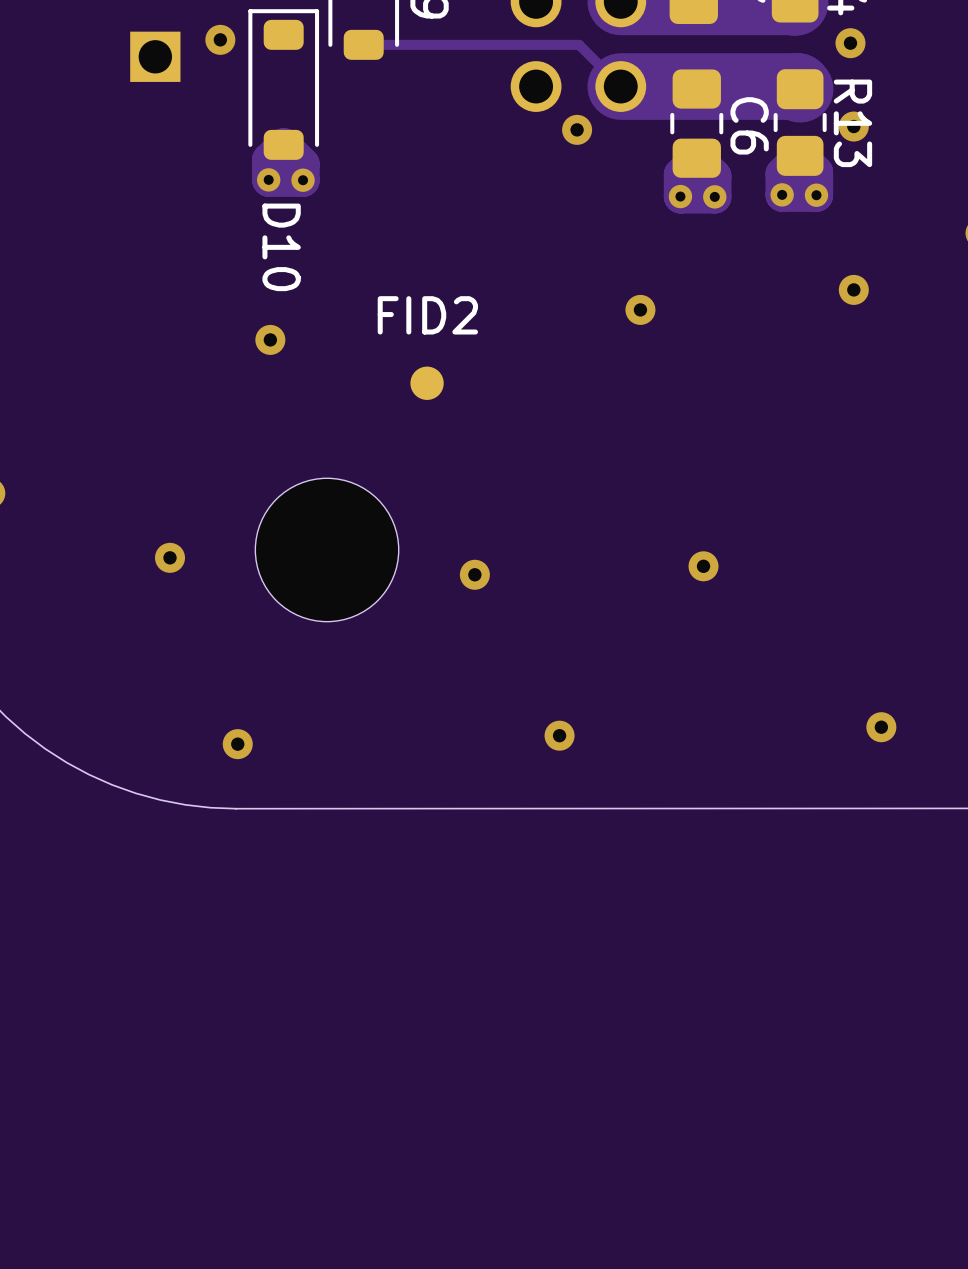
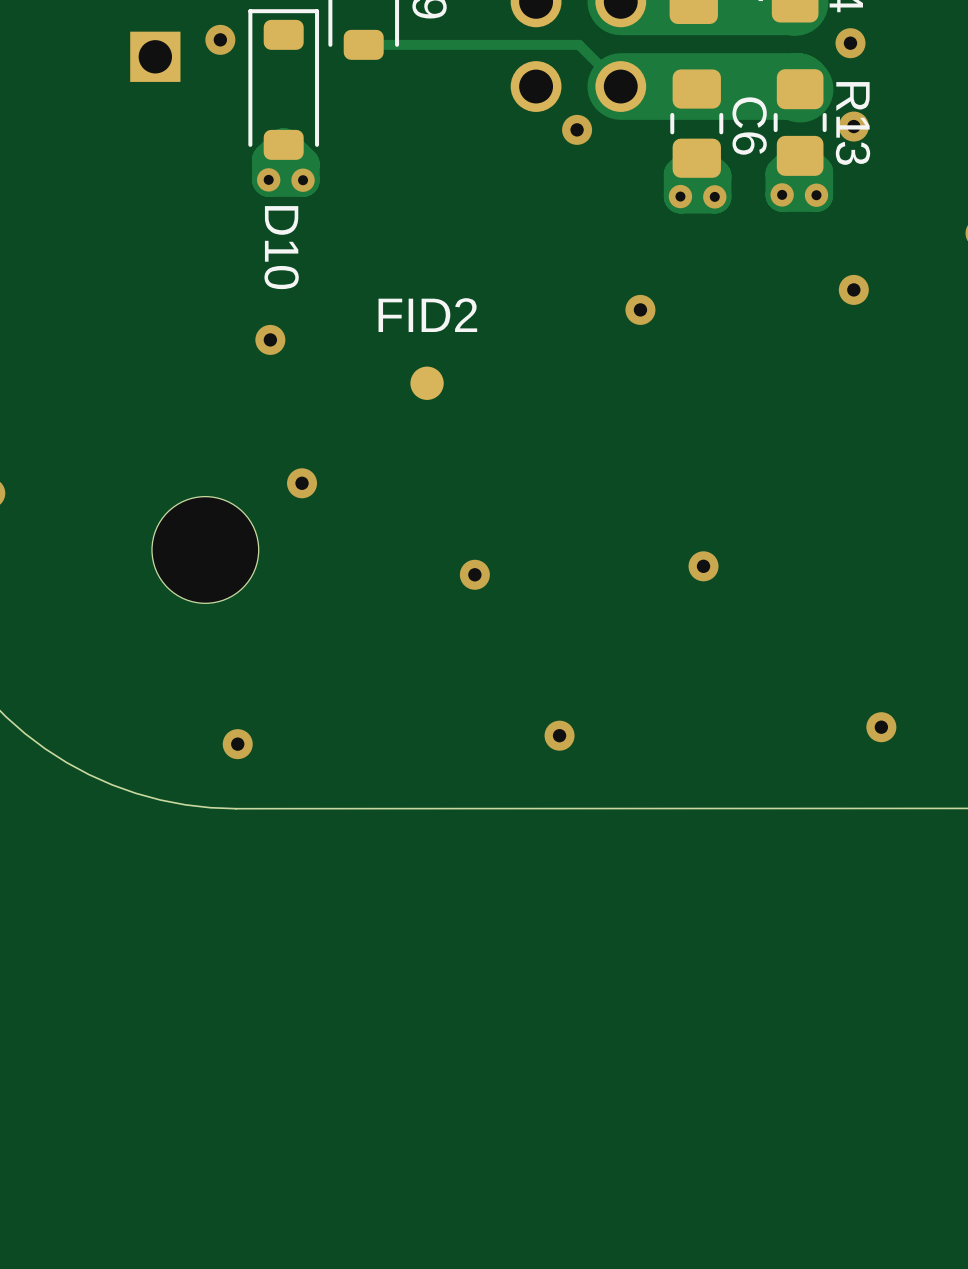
part: none -> (205, 549)
part: (327, 549) -> none
via position: (170, 557) -> (302, 483)

